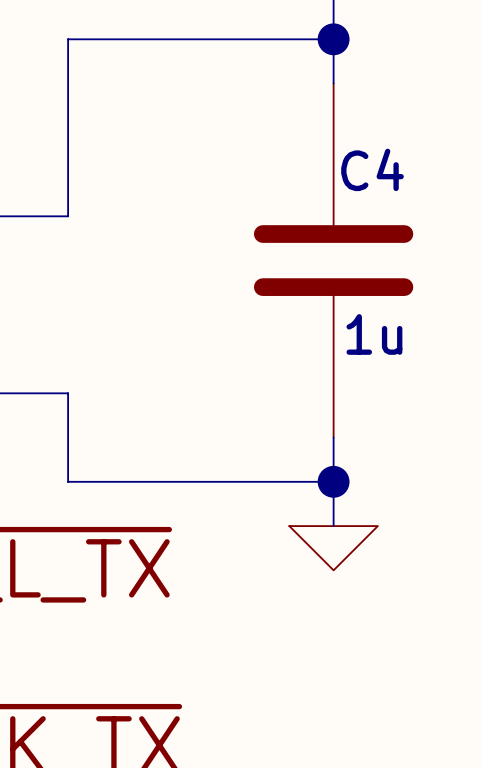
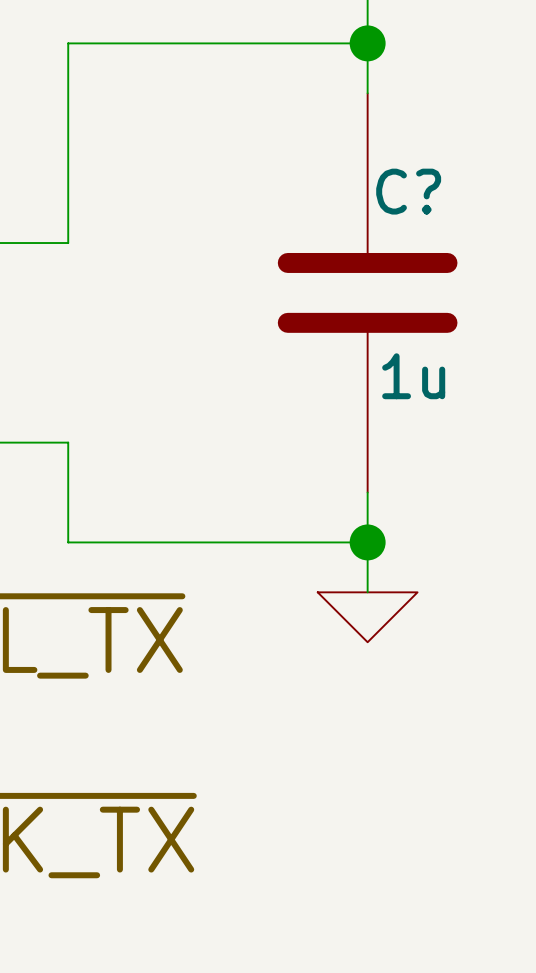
C4 name: C4 (372, 169) -> C? (408, 191)

